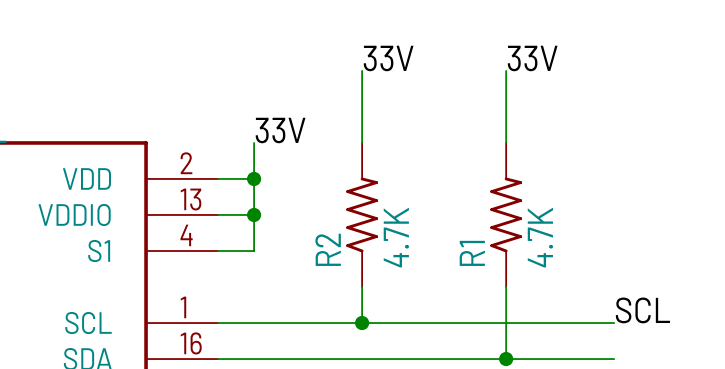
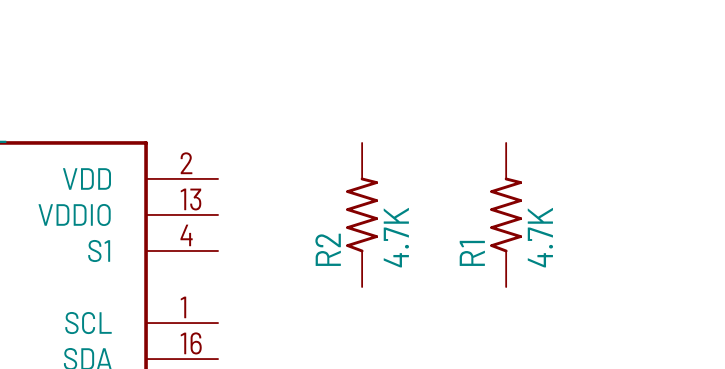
label: 33V (388, 58) -> none
label: 33V (532, 58) -> none
wire: (362, 70) (362, 142) -> none
wire: (506, 70) (506, 142) -> none
label: 33V (280, 130) -> none
wire: (254, 142) (254, 250) (218, 250) -> none
wire: (218, 178) (254, 178) -> none
junction: (254, 178) -> none
wire: (218, 214) (254, 214) -> none
junction: (254, 214) -> none
wire: (362, 287) (362, 323) -> none
wire: (506, 287) (506, 359) -> none
label: SCL (642, 310) -> none
wire: (218, 323) (614, 323) -> none
junction: (362, 323) -> none
wire: (218, 359) (614, 359) -> none
junction: (506, 359) -> none

